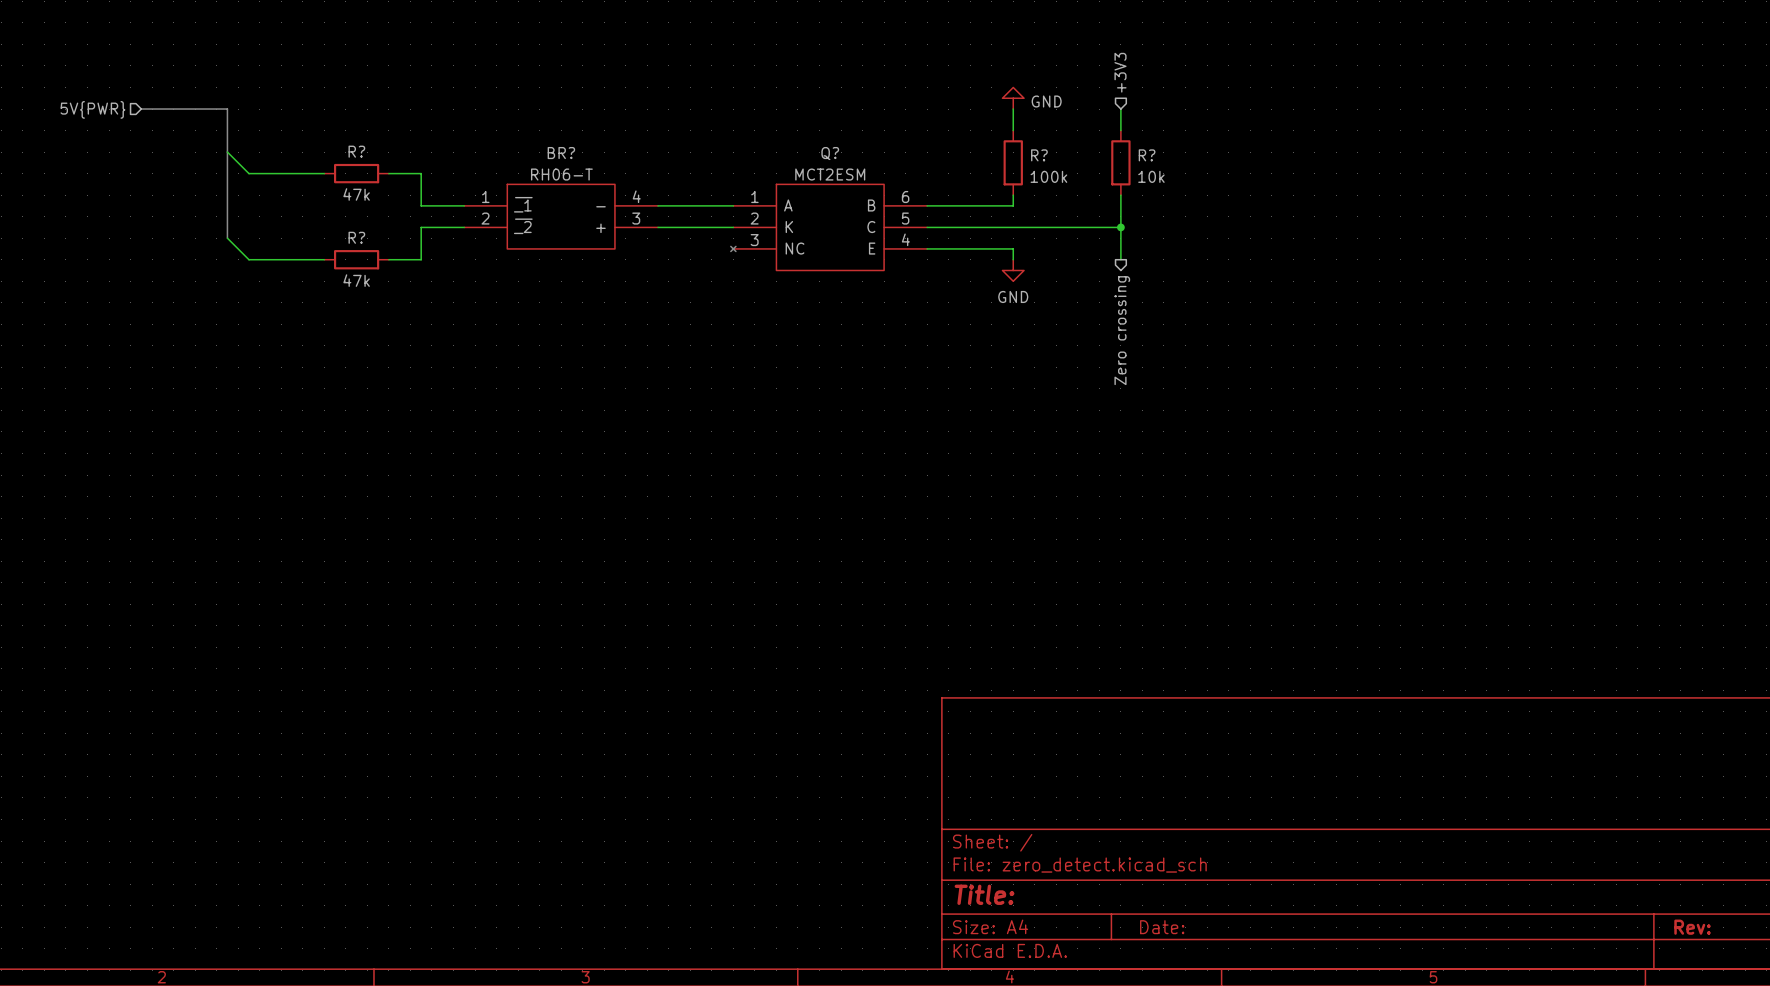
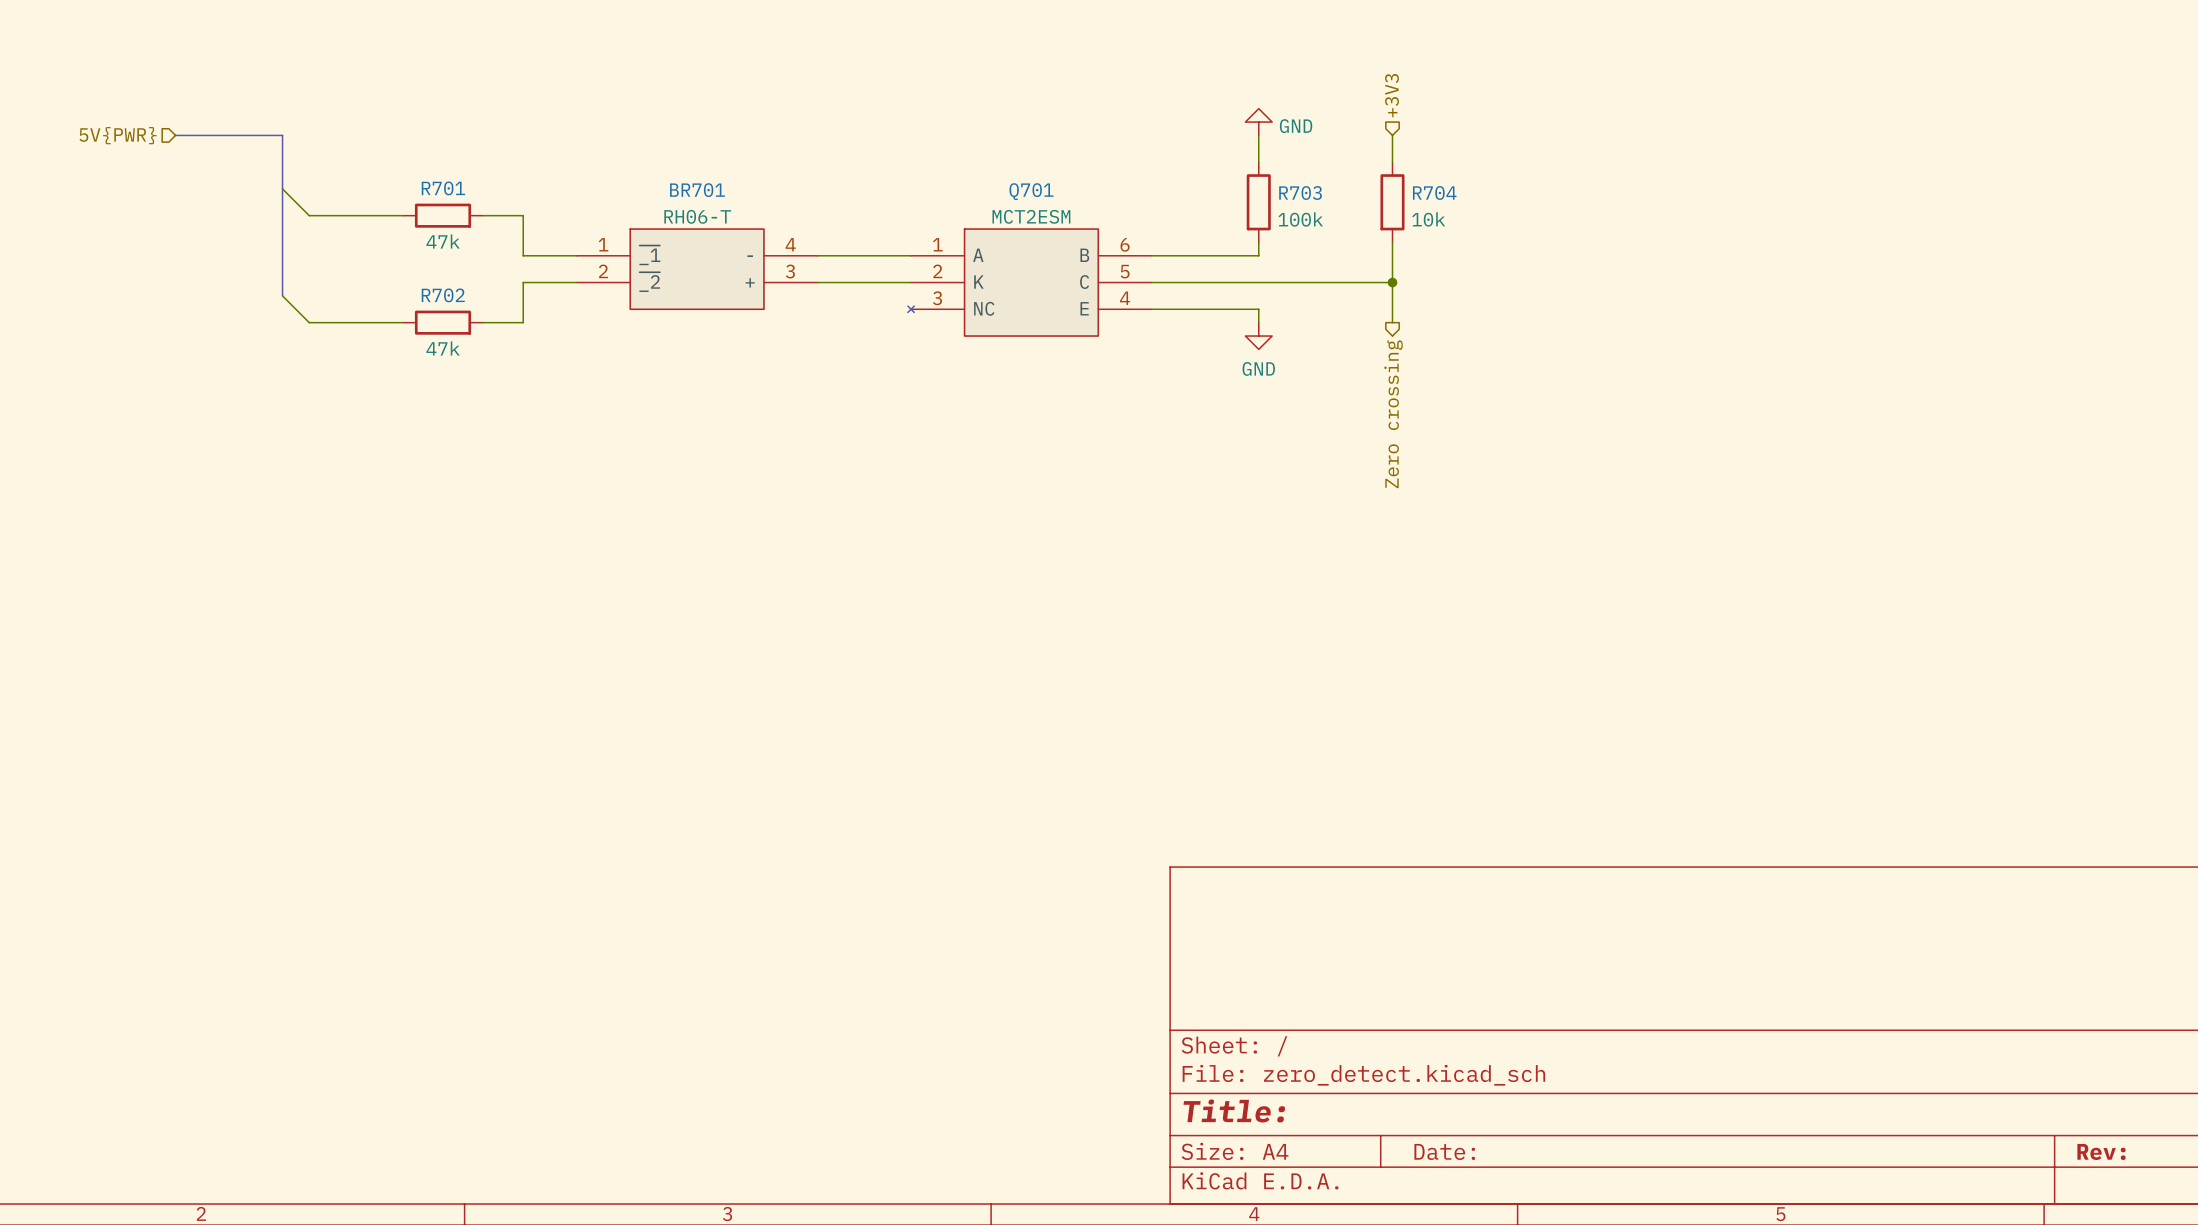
R? name: R? (356, 151) -> R701 (443, 188)
BR? name: BR? (561, 153) -> BR701 (697, 190)
Q? name: Q? (830, 153) -> Q701 (1031, 191)
R? name: R? (1039, 155) -> R703 (1300, 193)
R? name: R? (1147, 155) -> R704 (1434, 193)
R? name: R? (356, 237) -> R702 (443, 295)

